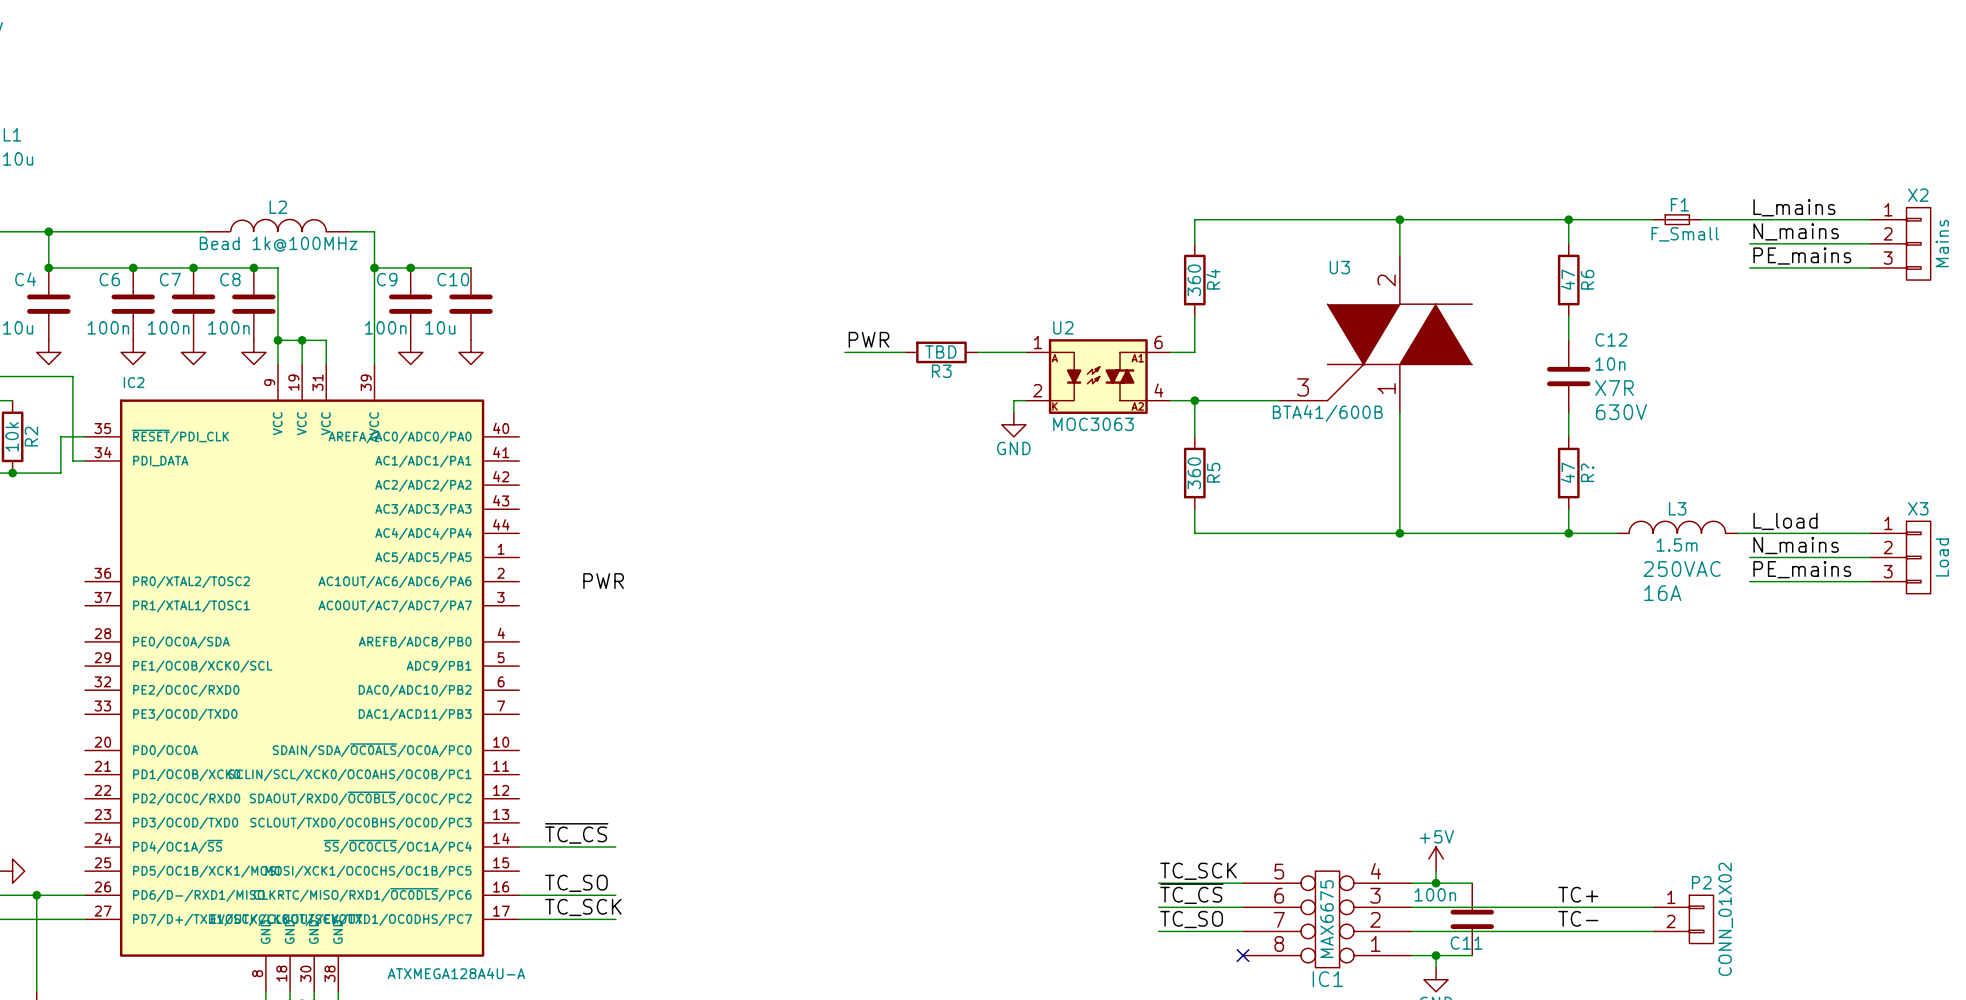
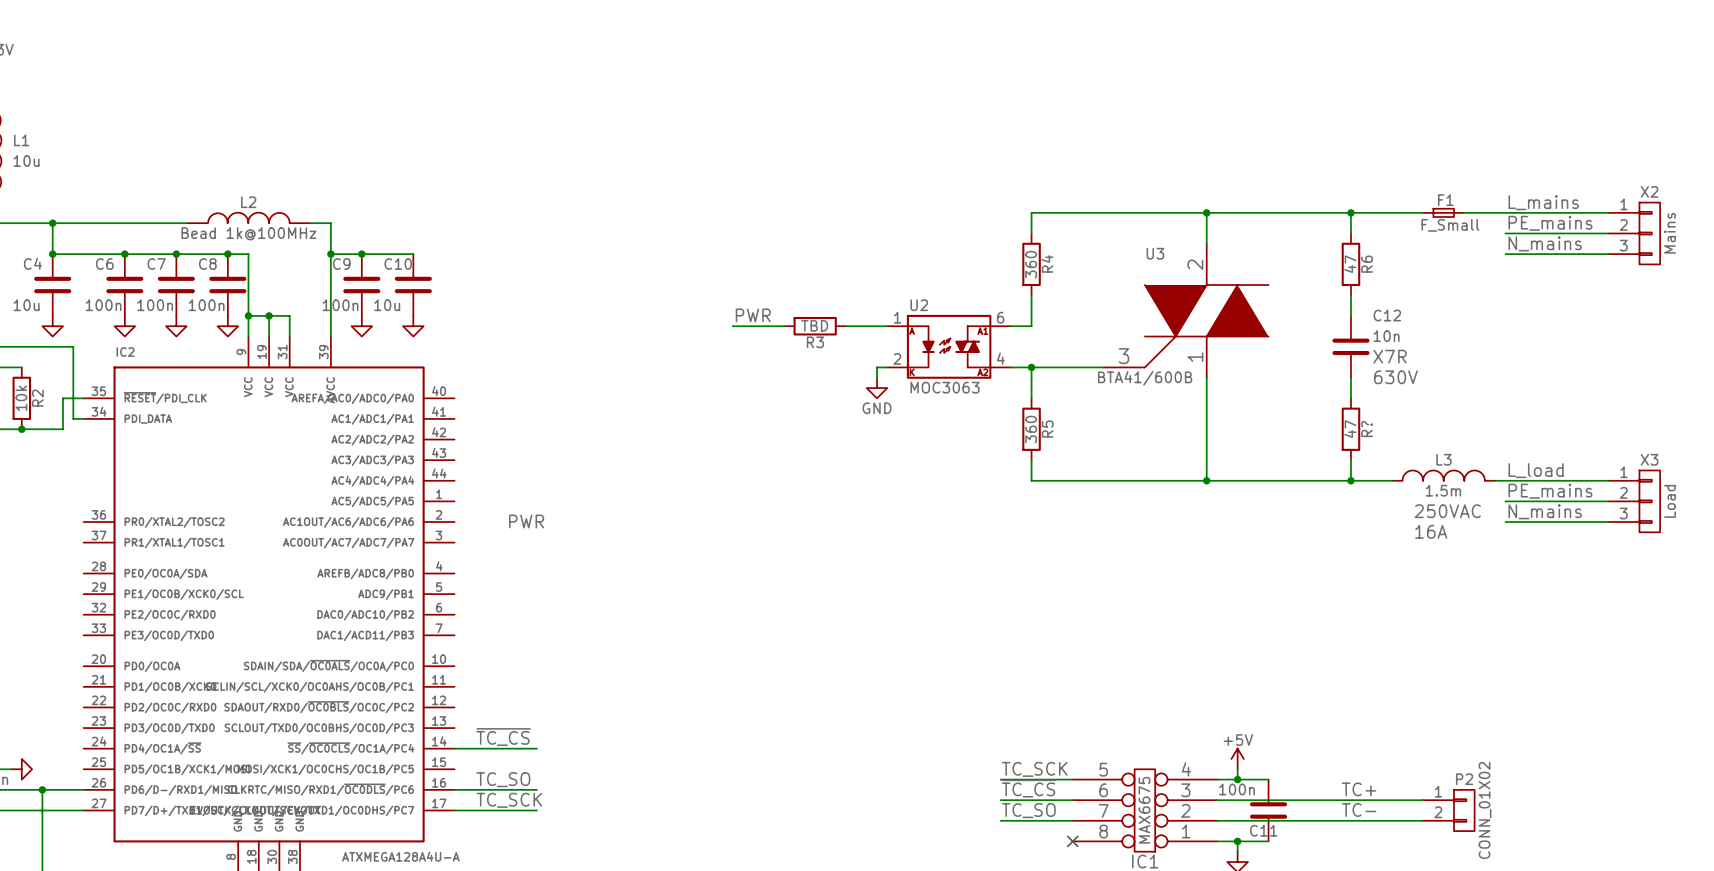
label: N_mains (1796, 231) -> PE_mains (1550, 223)
label: PE_mains (1802, 256) -> N_mains (1545, 243)
label: N_mains (1796, 545) -> PE_mains (1550, 491)
label: PE_mains (1802, 569) -> N_mains (1545, 511)

